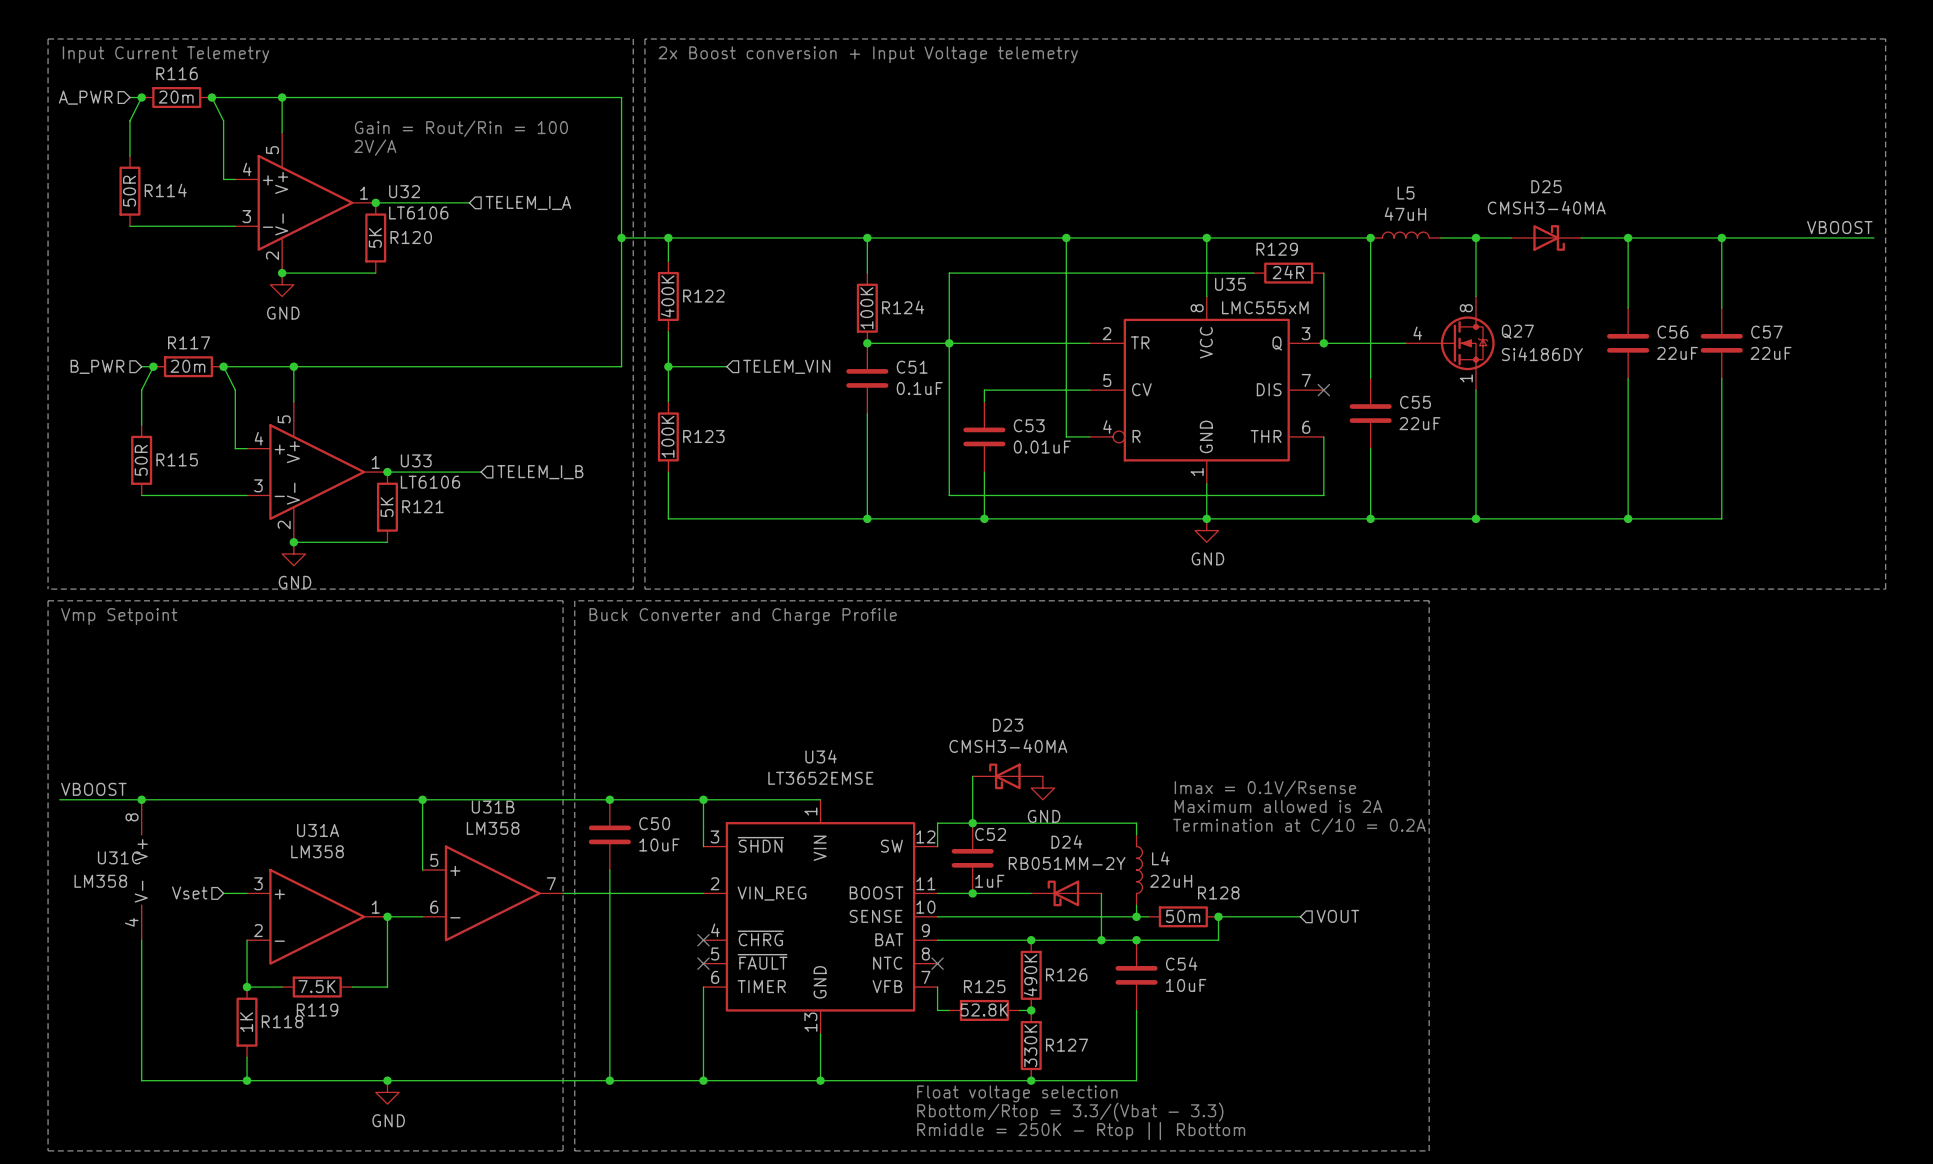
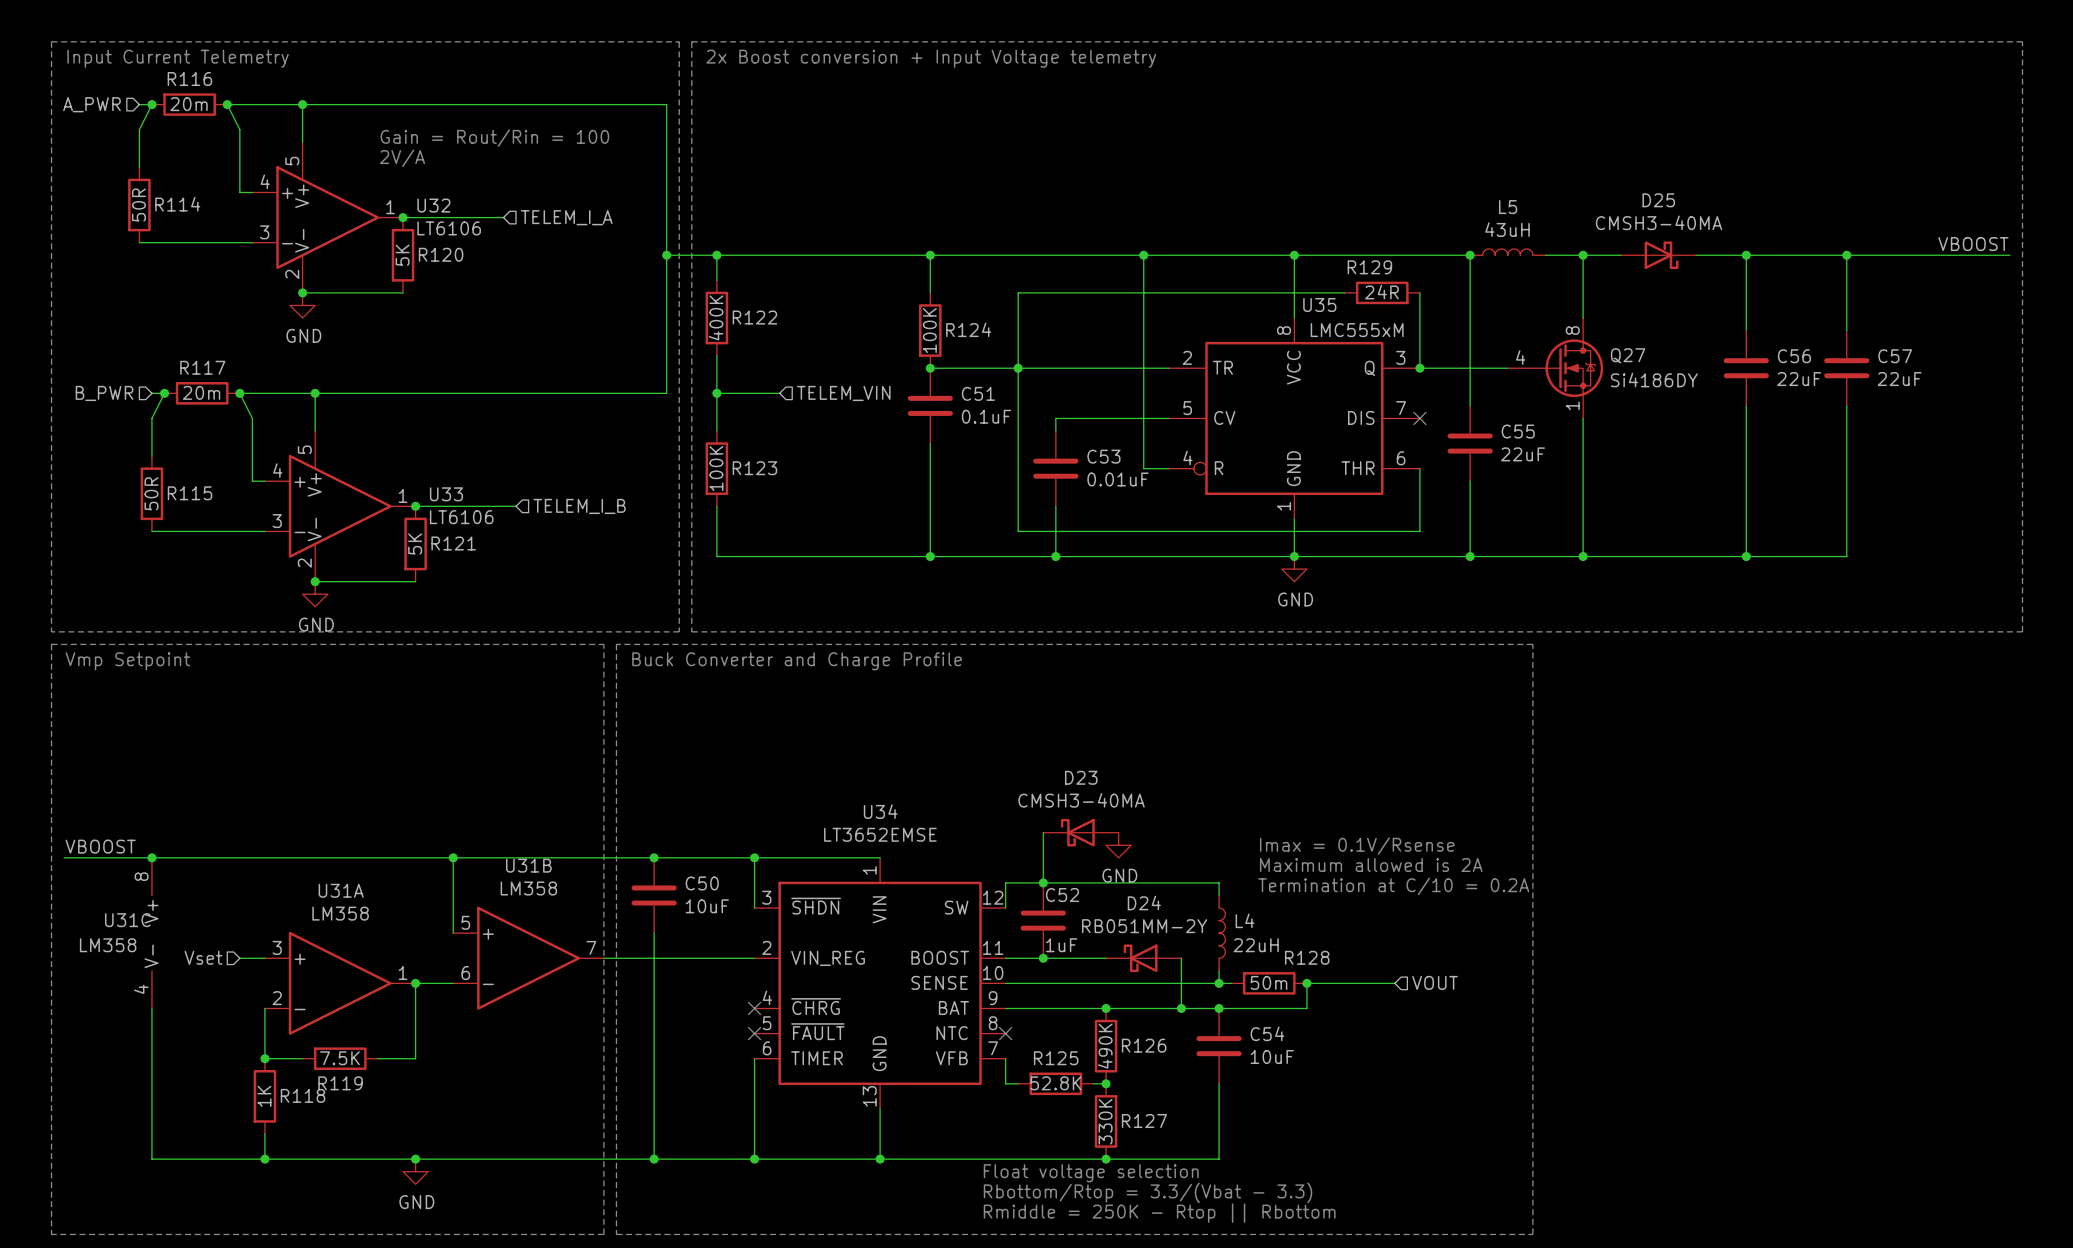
L5 value: 47uH (1405, 214) -> 43uH (1507, 229)

